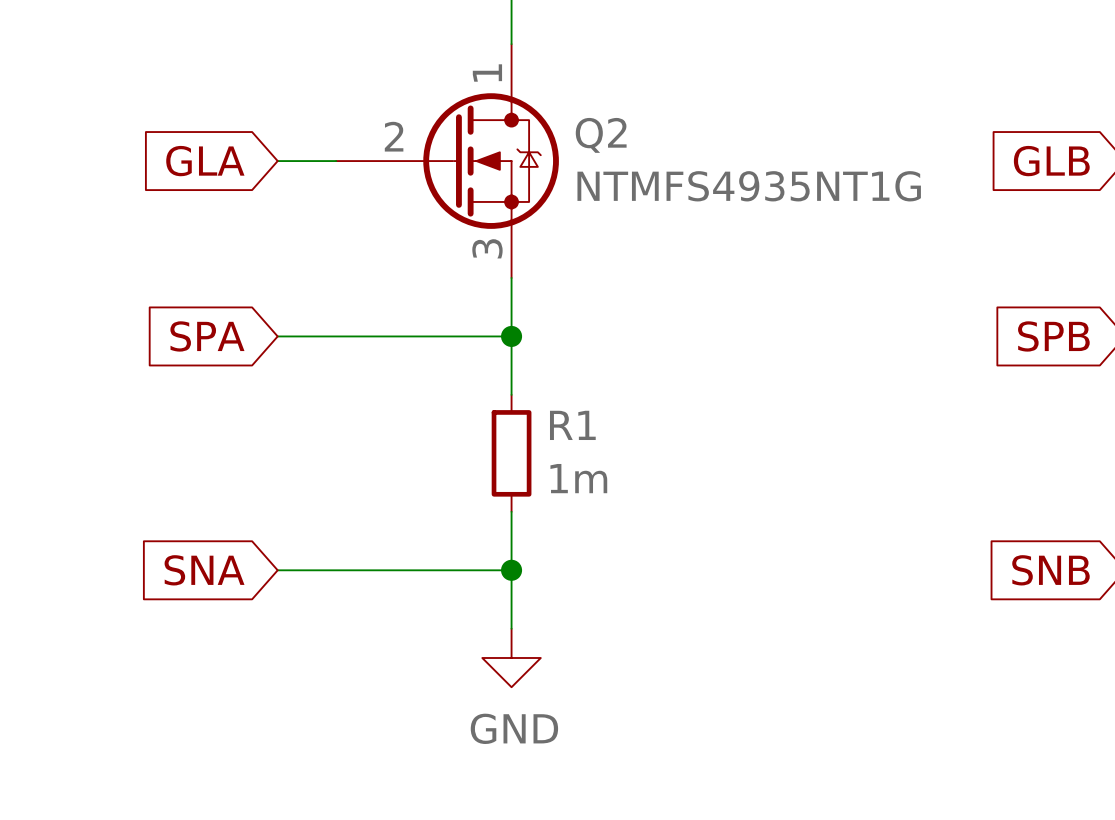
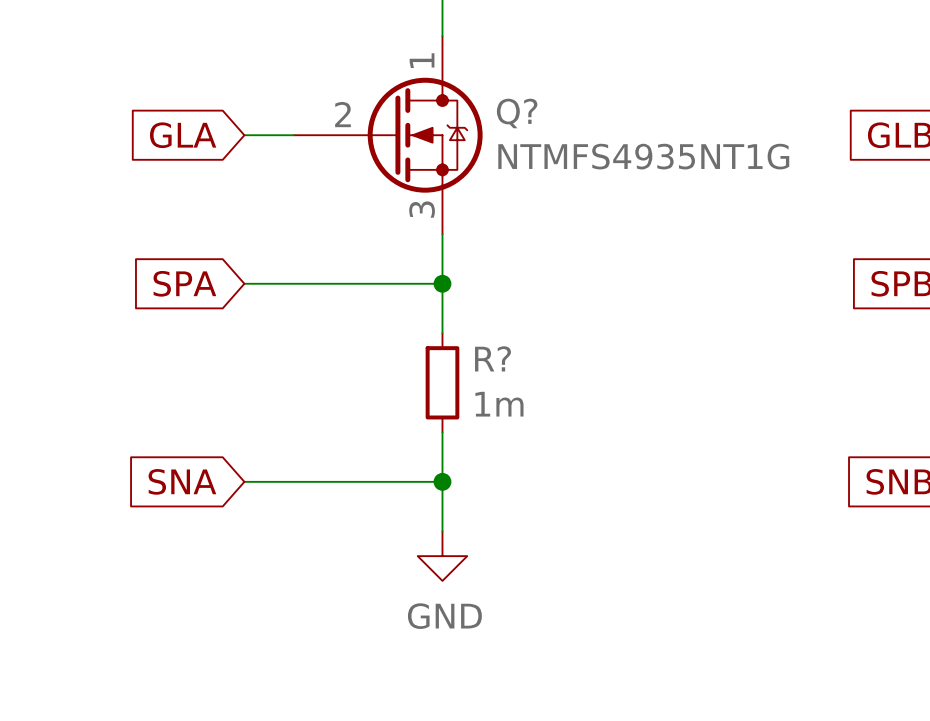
Q2 name: Q2 (601, 135) -> Q? (517, 113)
R1 name: R1 (572, 425) -> R? (492, 358)

